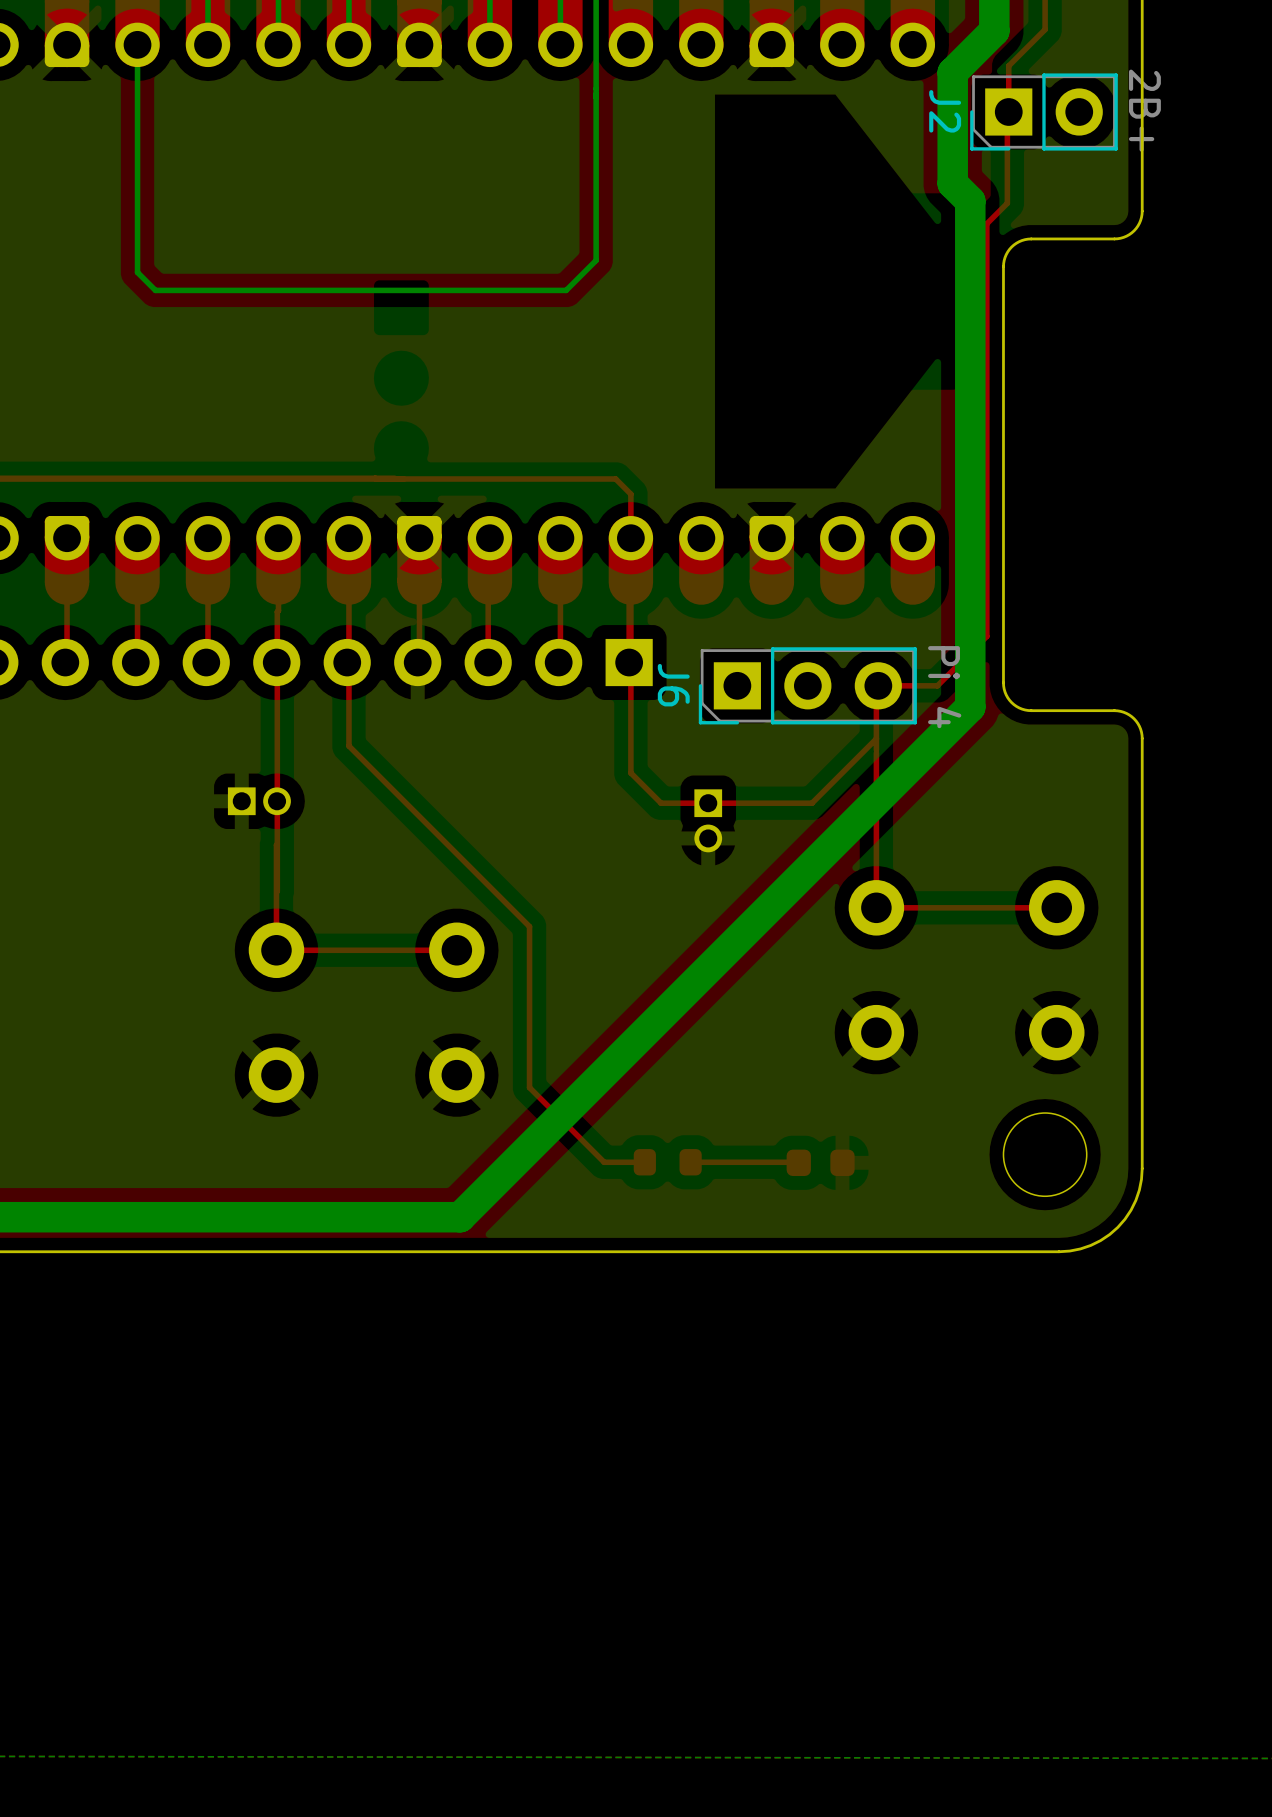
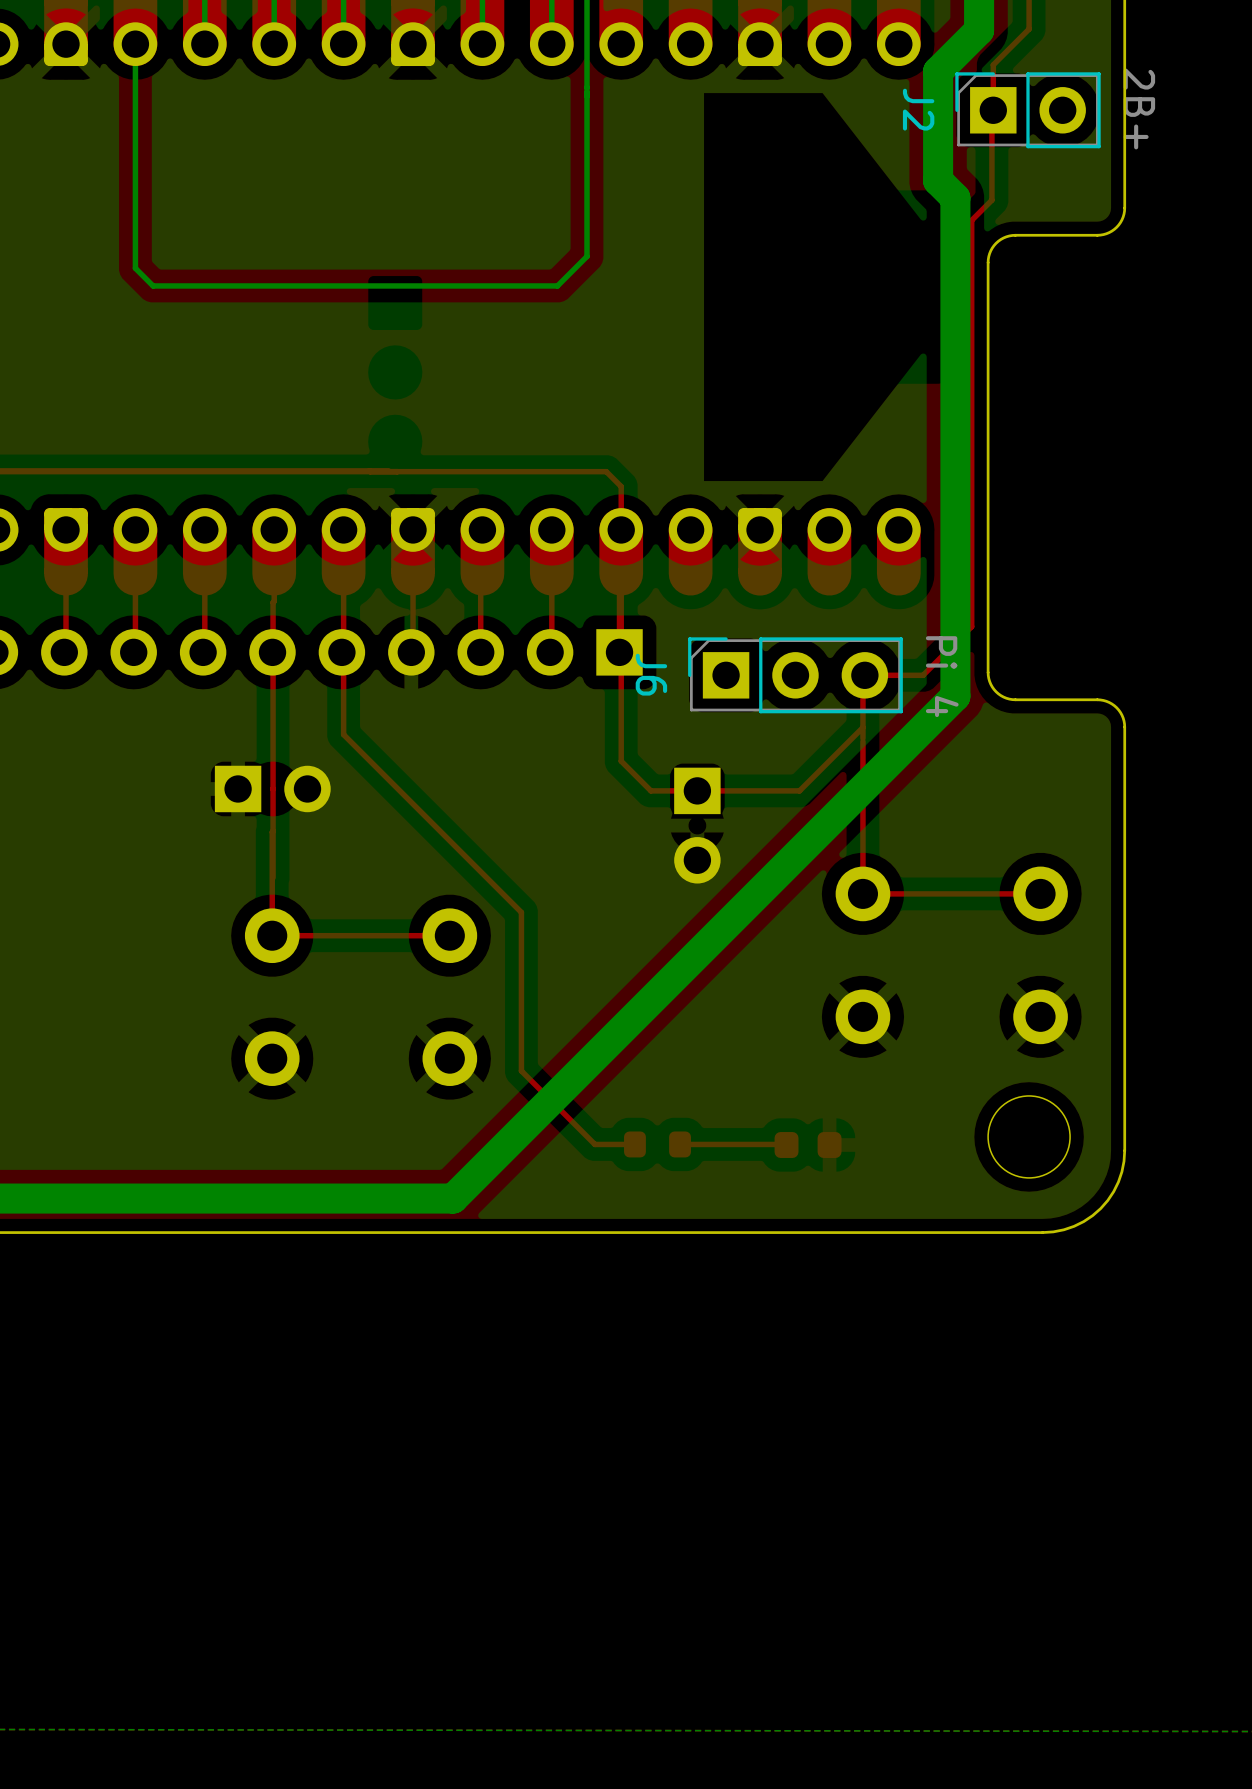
J2 footprint: [970, 73, 1118, 151] -> [955, 72, 1101, 149]
J6 footprint: [698, 647, 917, 725] -> [688, 637, 903, 714]
part footprint: [227, 787, 291, 816] -> [214, 765, 331, 813]
part footprint: [694, 789, 723, 853] -> [674, 767, 721, 884]

